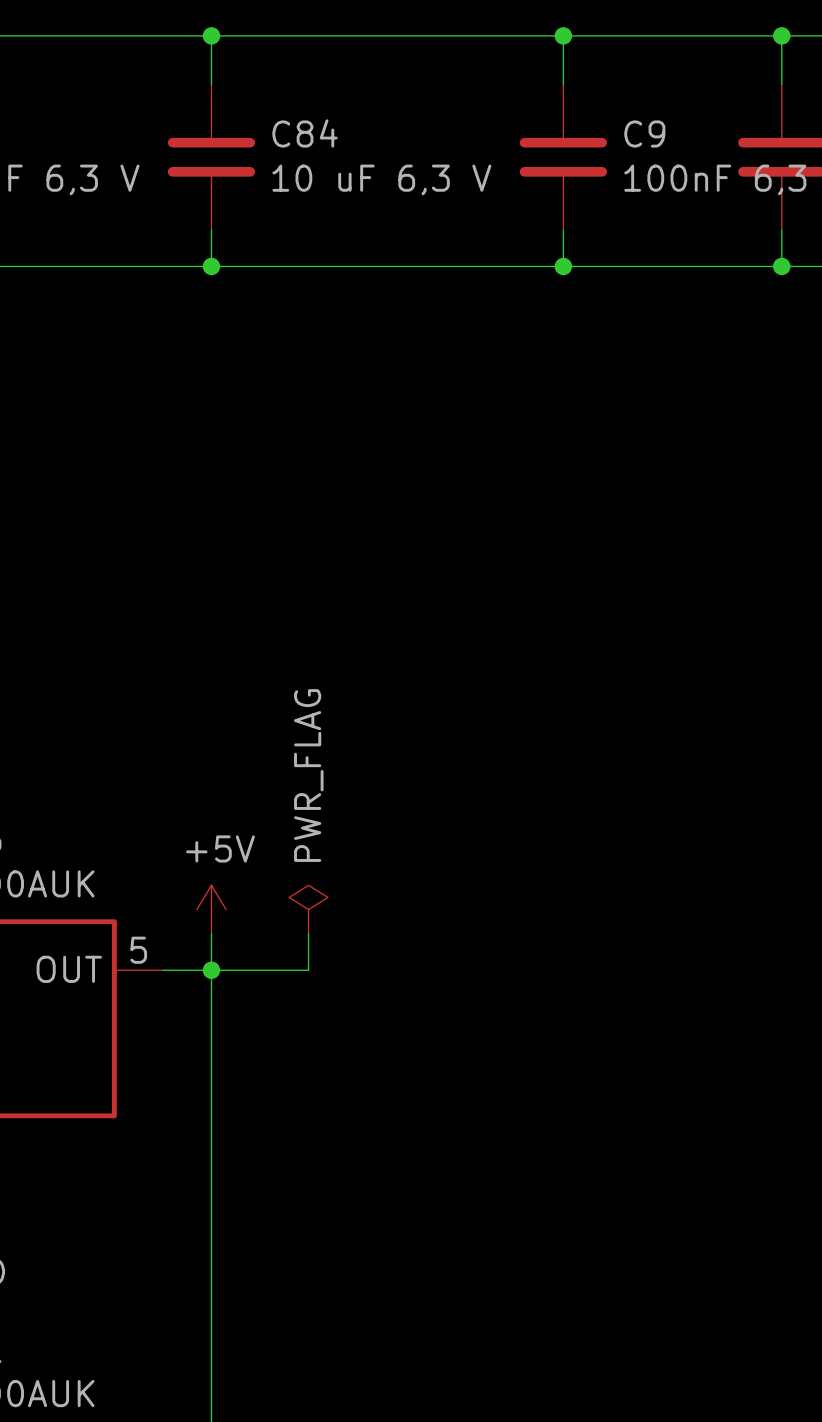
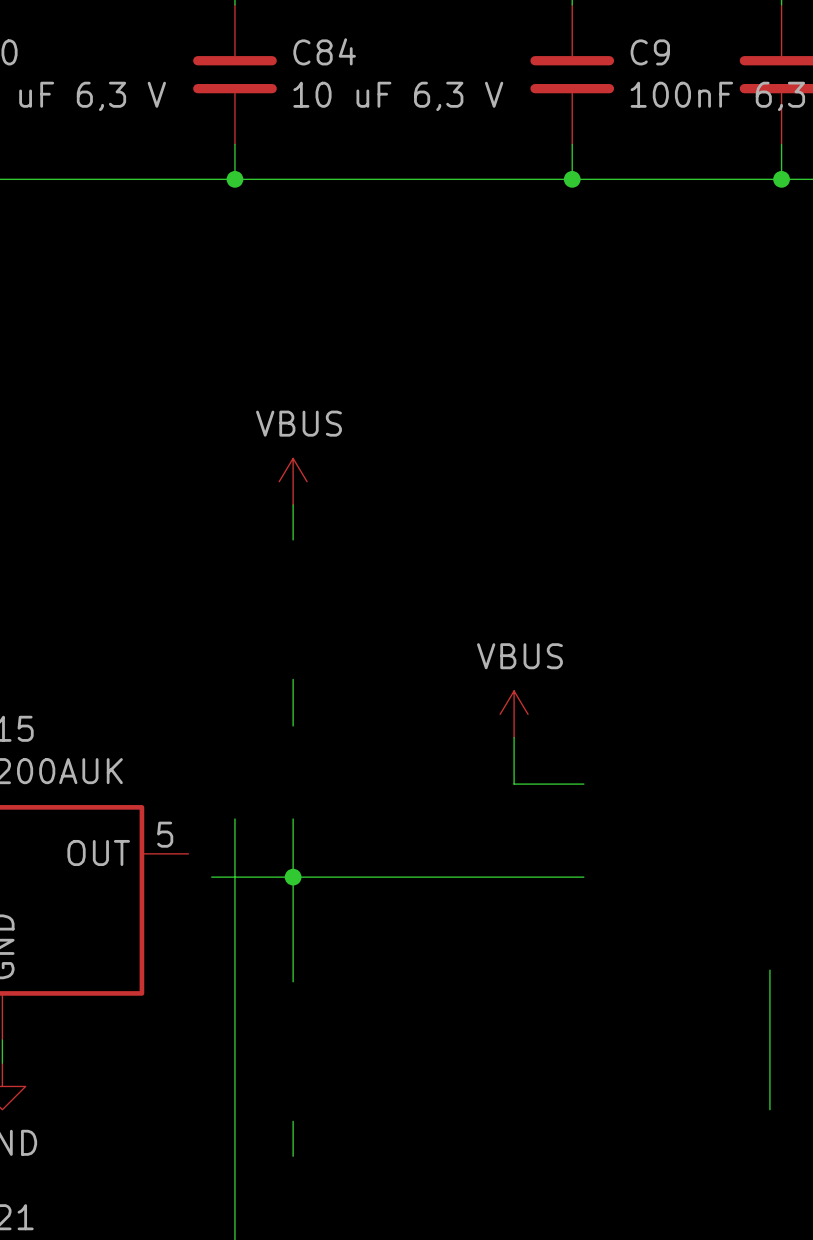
power symbol: none -> VBUS (293, 481)
wire: none -> (293, 504) (293, 539)
wire: none -> (293, 679) (293, 725)
power symbol: none -> VBUS (514, 714)
wire: none -> (514, 737) (514, 784) (583, 784)
power symbol: +5V (211, 909) -> none
power symbol: PWR_FLAG (308, 909) -> none
wire: none -> (293, 818) (293, 981)
wire: (308, 933) (308, 970) (162, 970) -> none
junction position: (211, 970) -> (293, 877)
wire: none -> (211, 877) (583, 877)
wire: none -> (769, 970) (769, 1109)
wire: none -> (293, 1121) (293, 1156)

